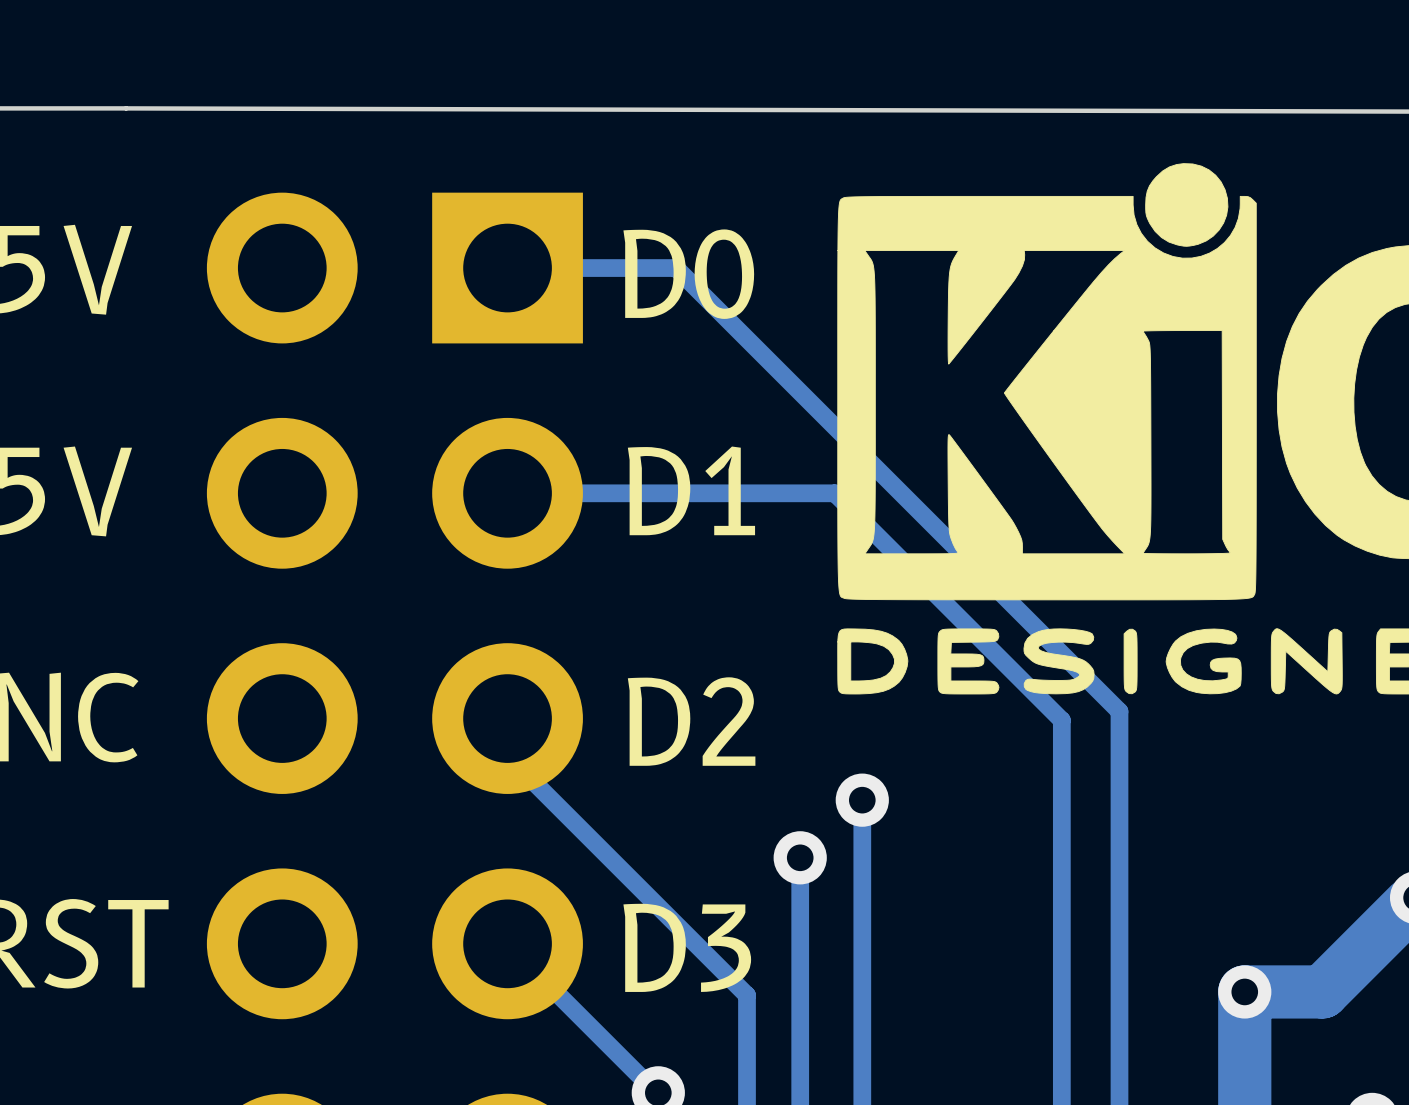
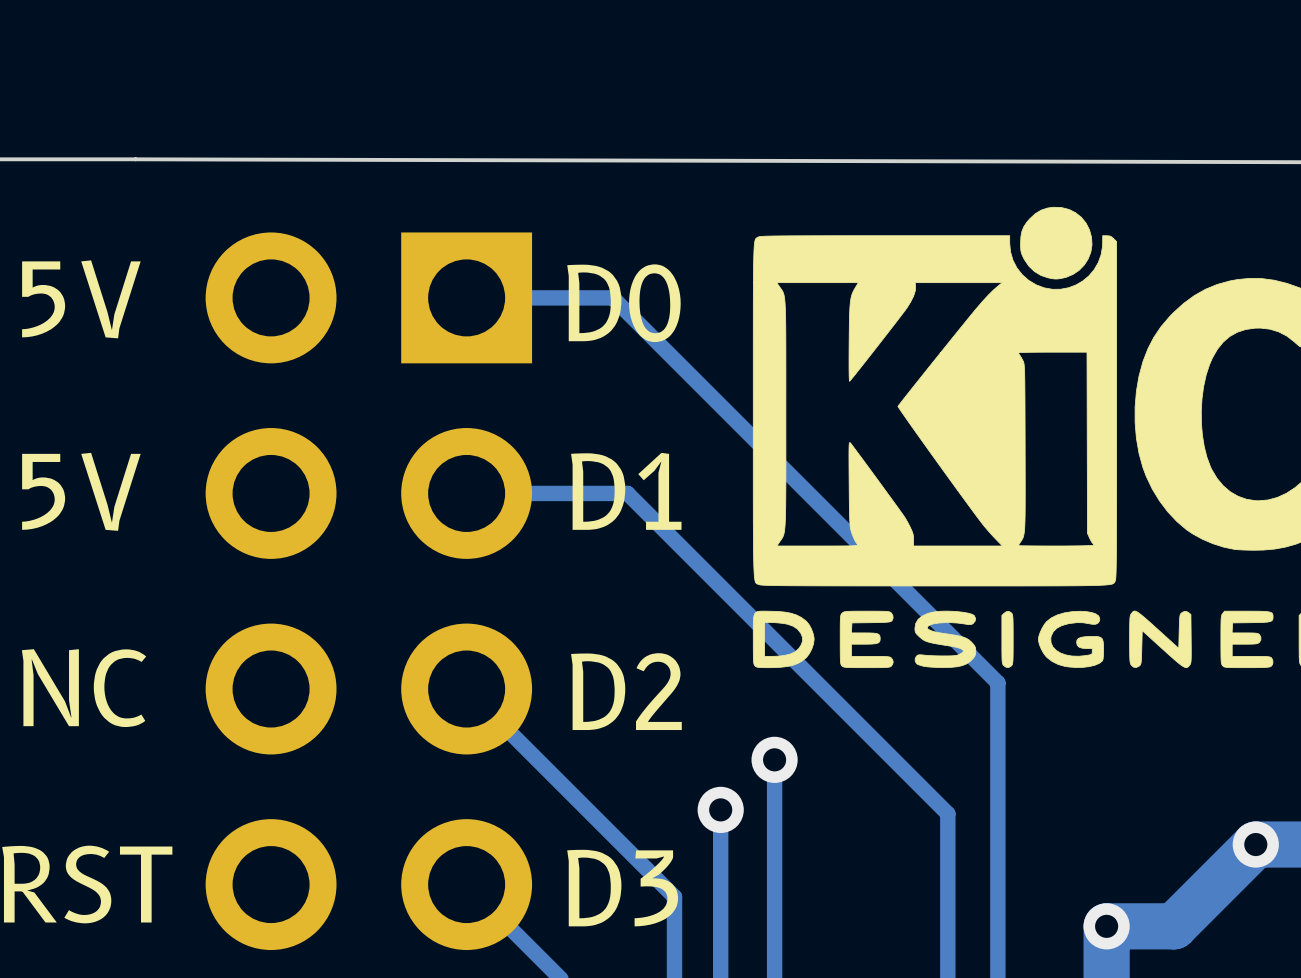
track: (692, 493) (834, 493) (1061, 720) (1061, 862) -> (627, 493) (947, 813)
track: (507, 755) (747, 995) -> (466, 689) (674, 896) (674, 929)

